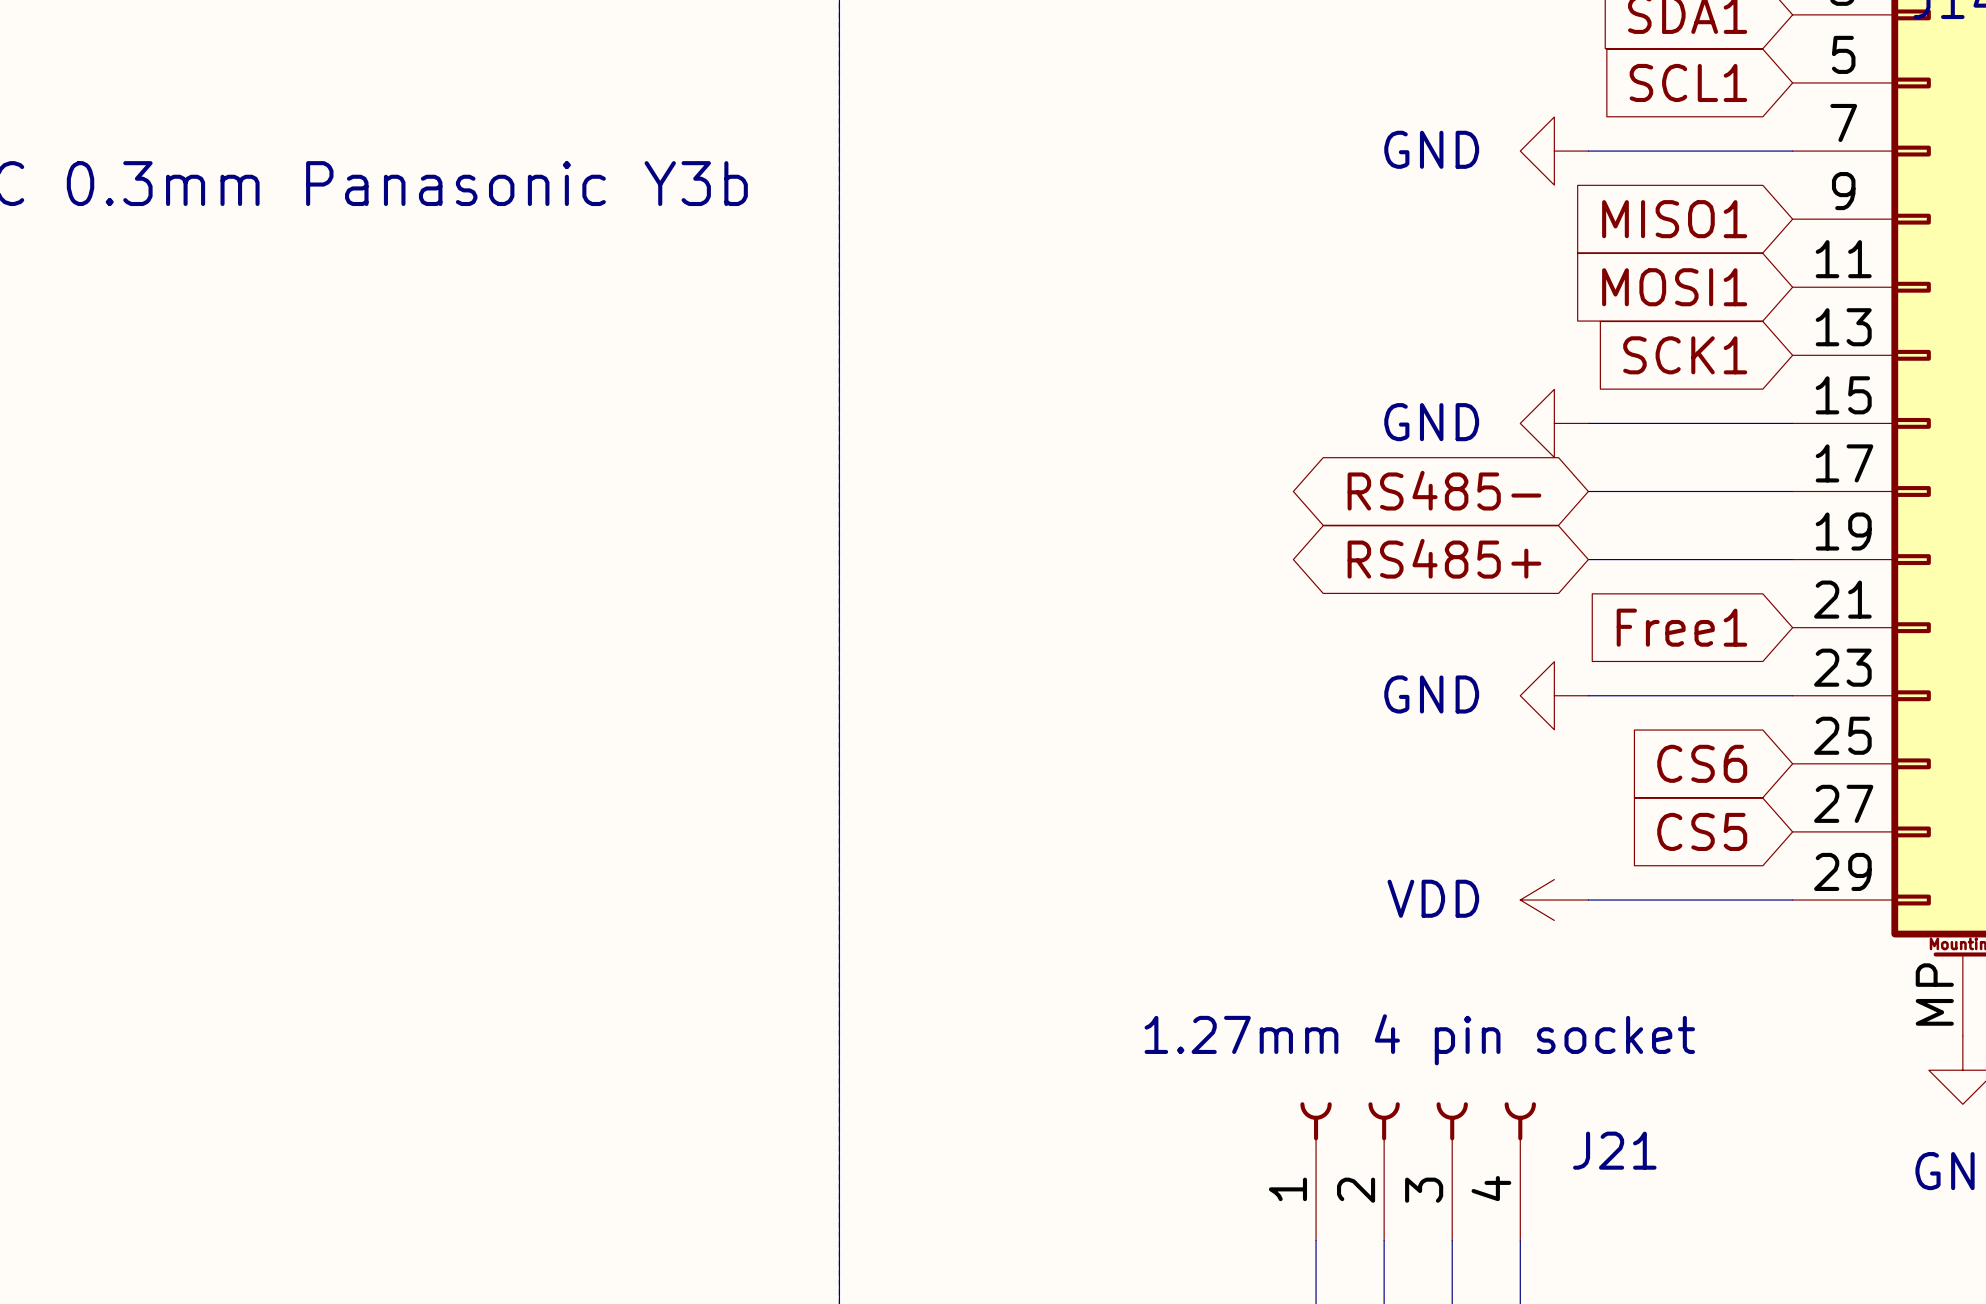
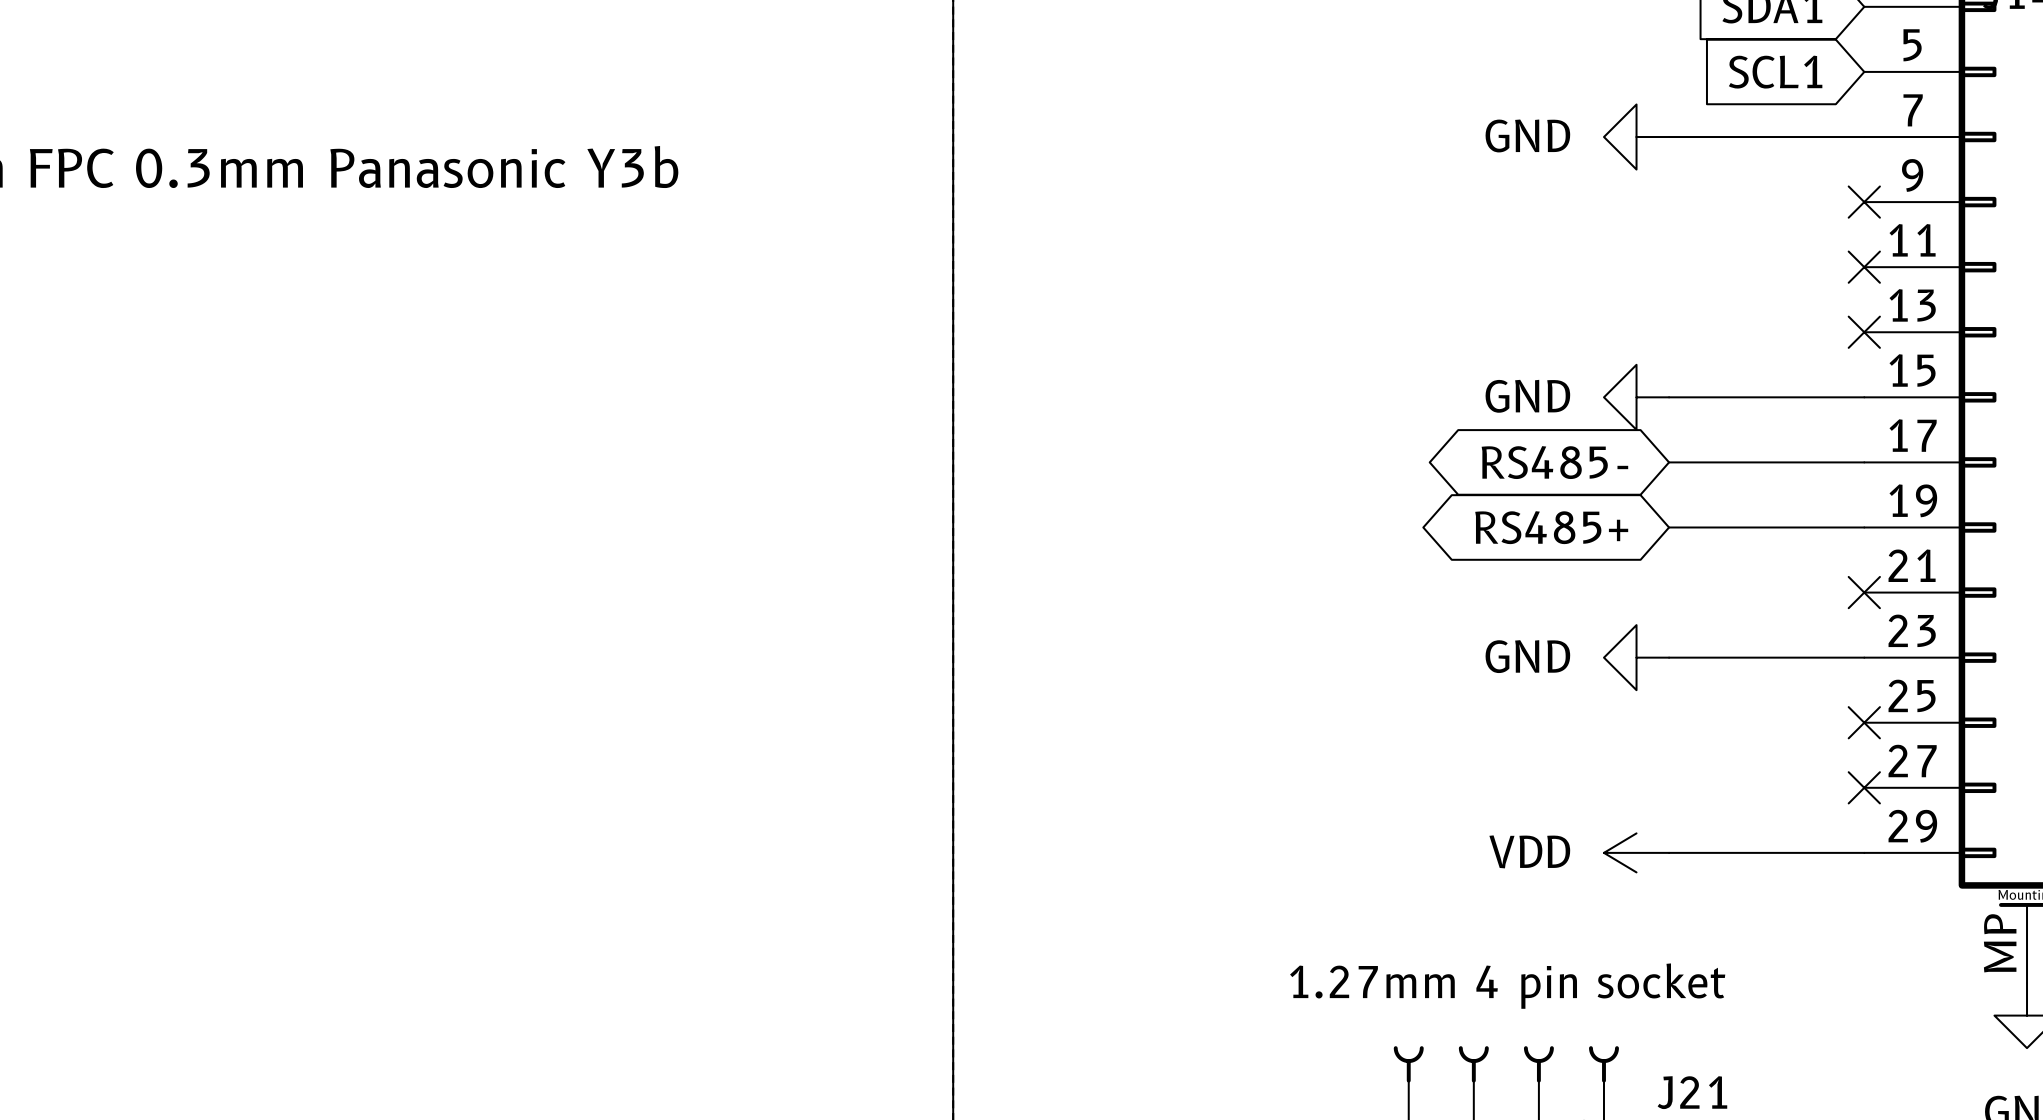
global label: MISO1 (1674, 219) -> none
no-connect mark: none -> (1864, 202)
global label: MOSI1 (1674, 287) -> none
no-connect mark: none -> (1864, 267)
global label: SCK1 (1685, 355) -> none
no-connect mark: none -> (1864, 332)
global label: Free1 (1681, 627) -> none
no-connect mark: none -> (1864, 592)
global label: CS6 (1702, 763) -> none
no-connect mark: none -> (1864, 722)
global label: CS5 (1702, 831) -> none
no-connect mark: none -> (1864, 787)

